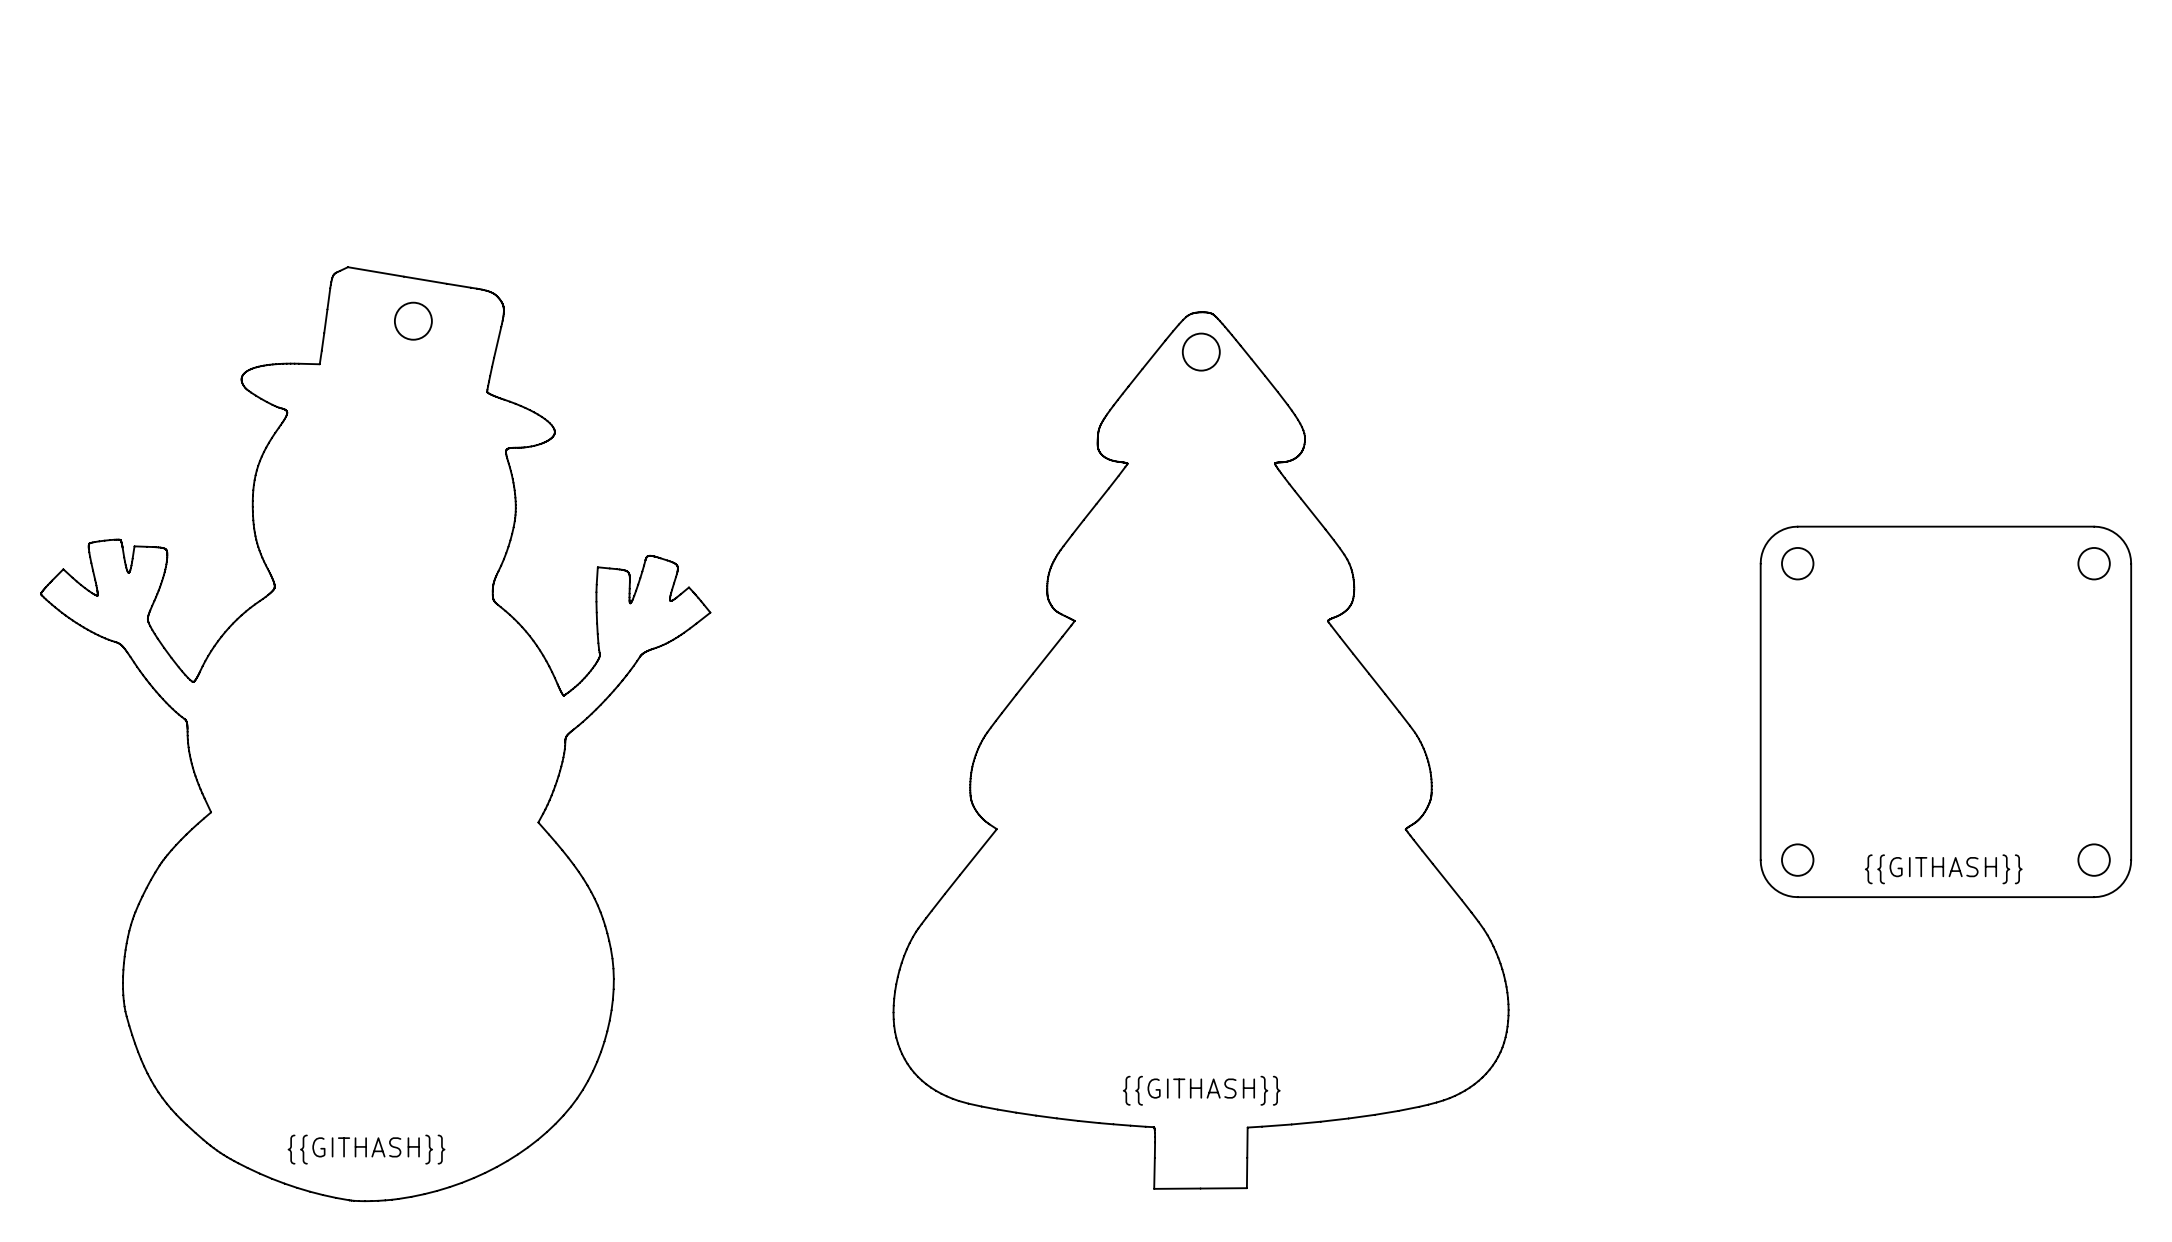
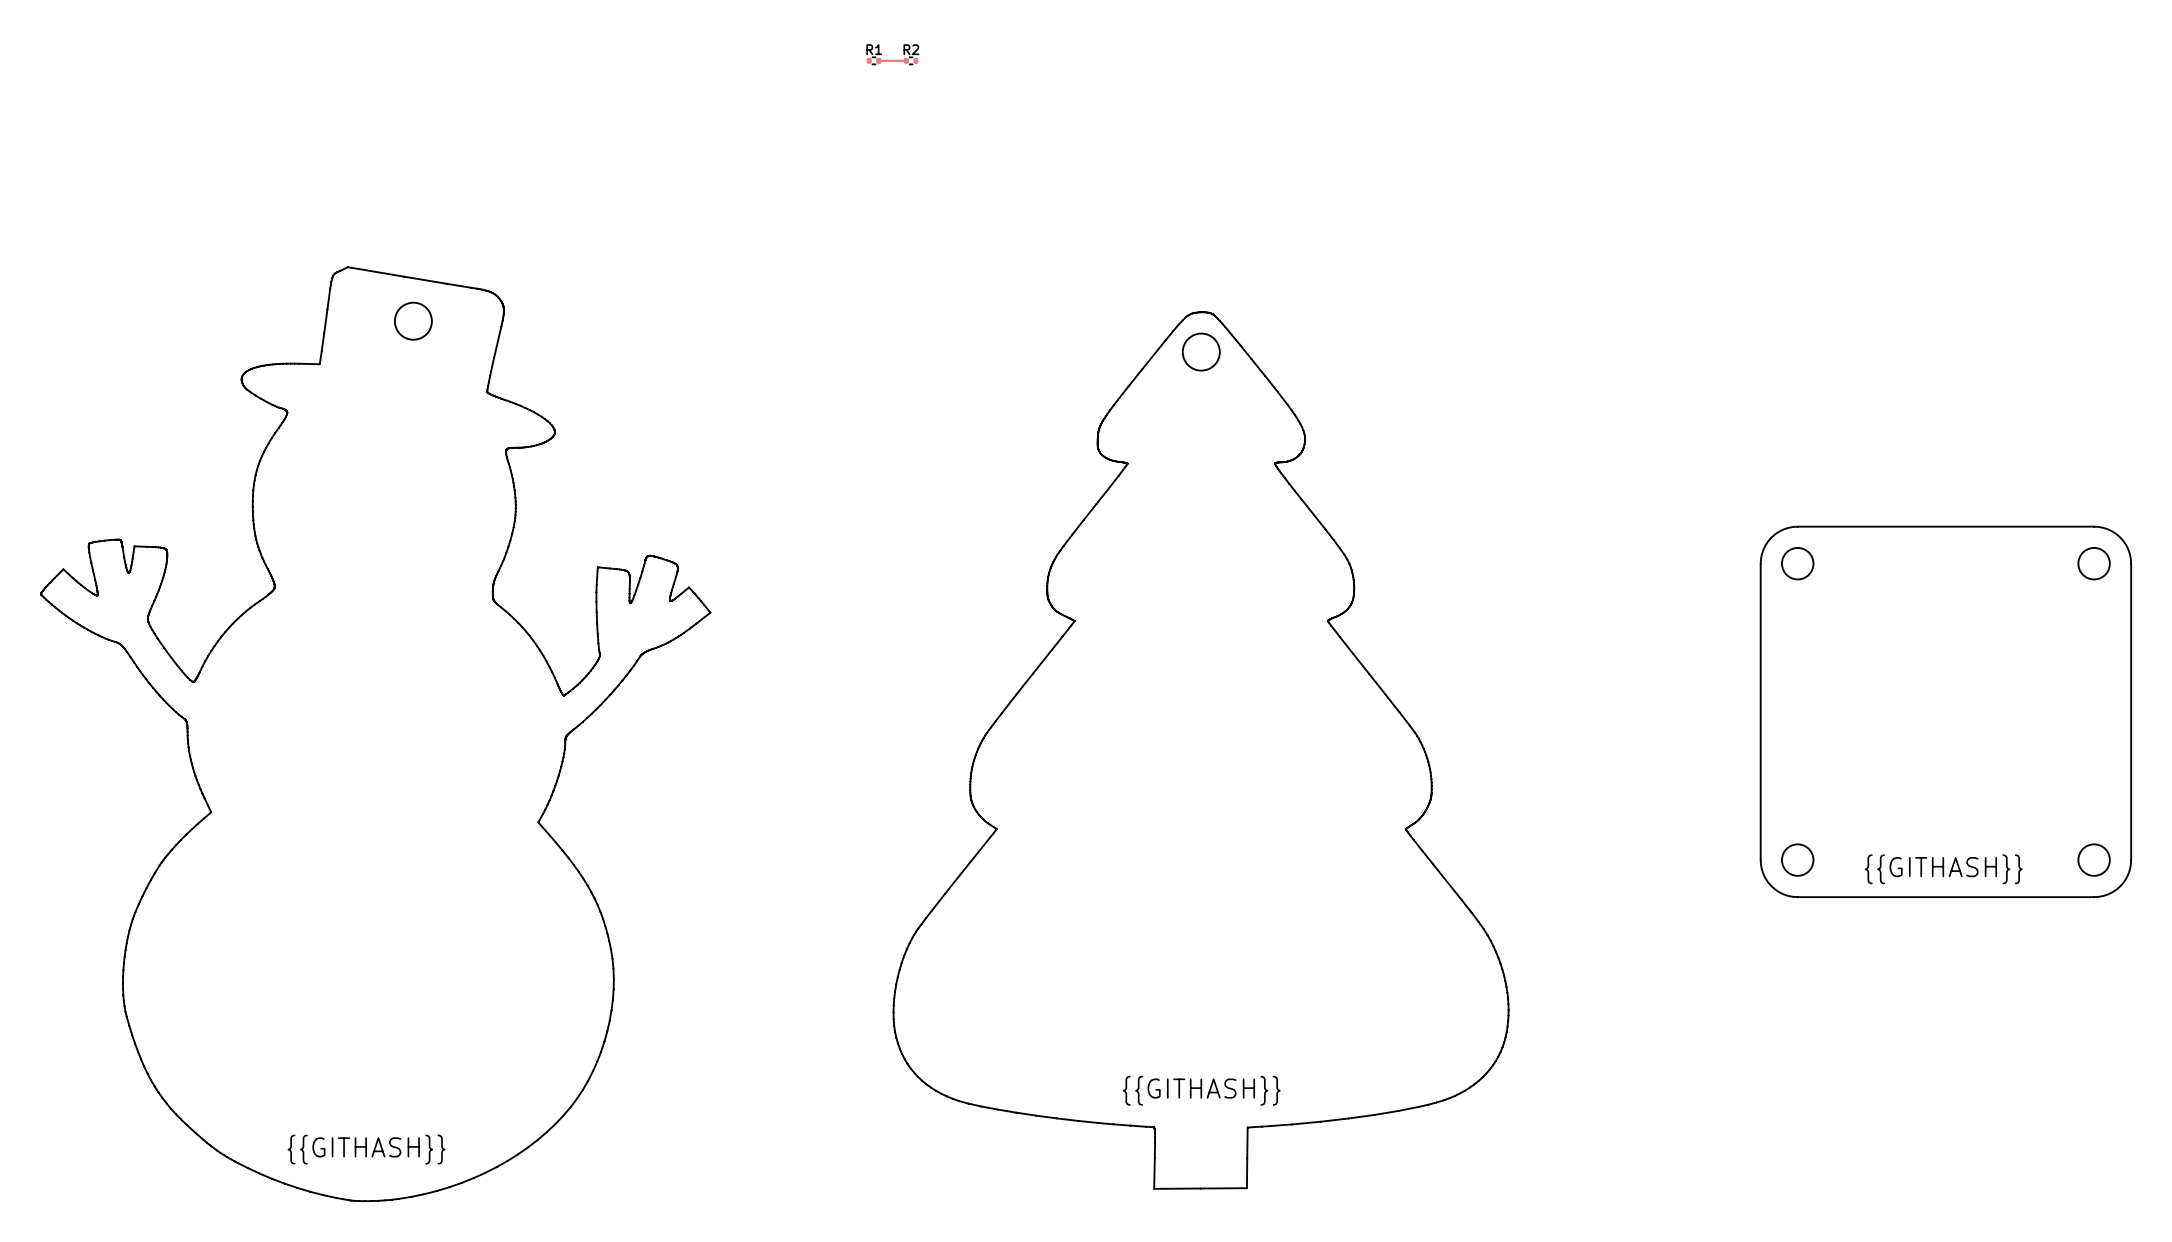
R1: none -> (873, 60)
top track: none -> (878, 60) (906, 60)
R2: none -> (911, 60)

